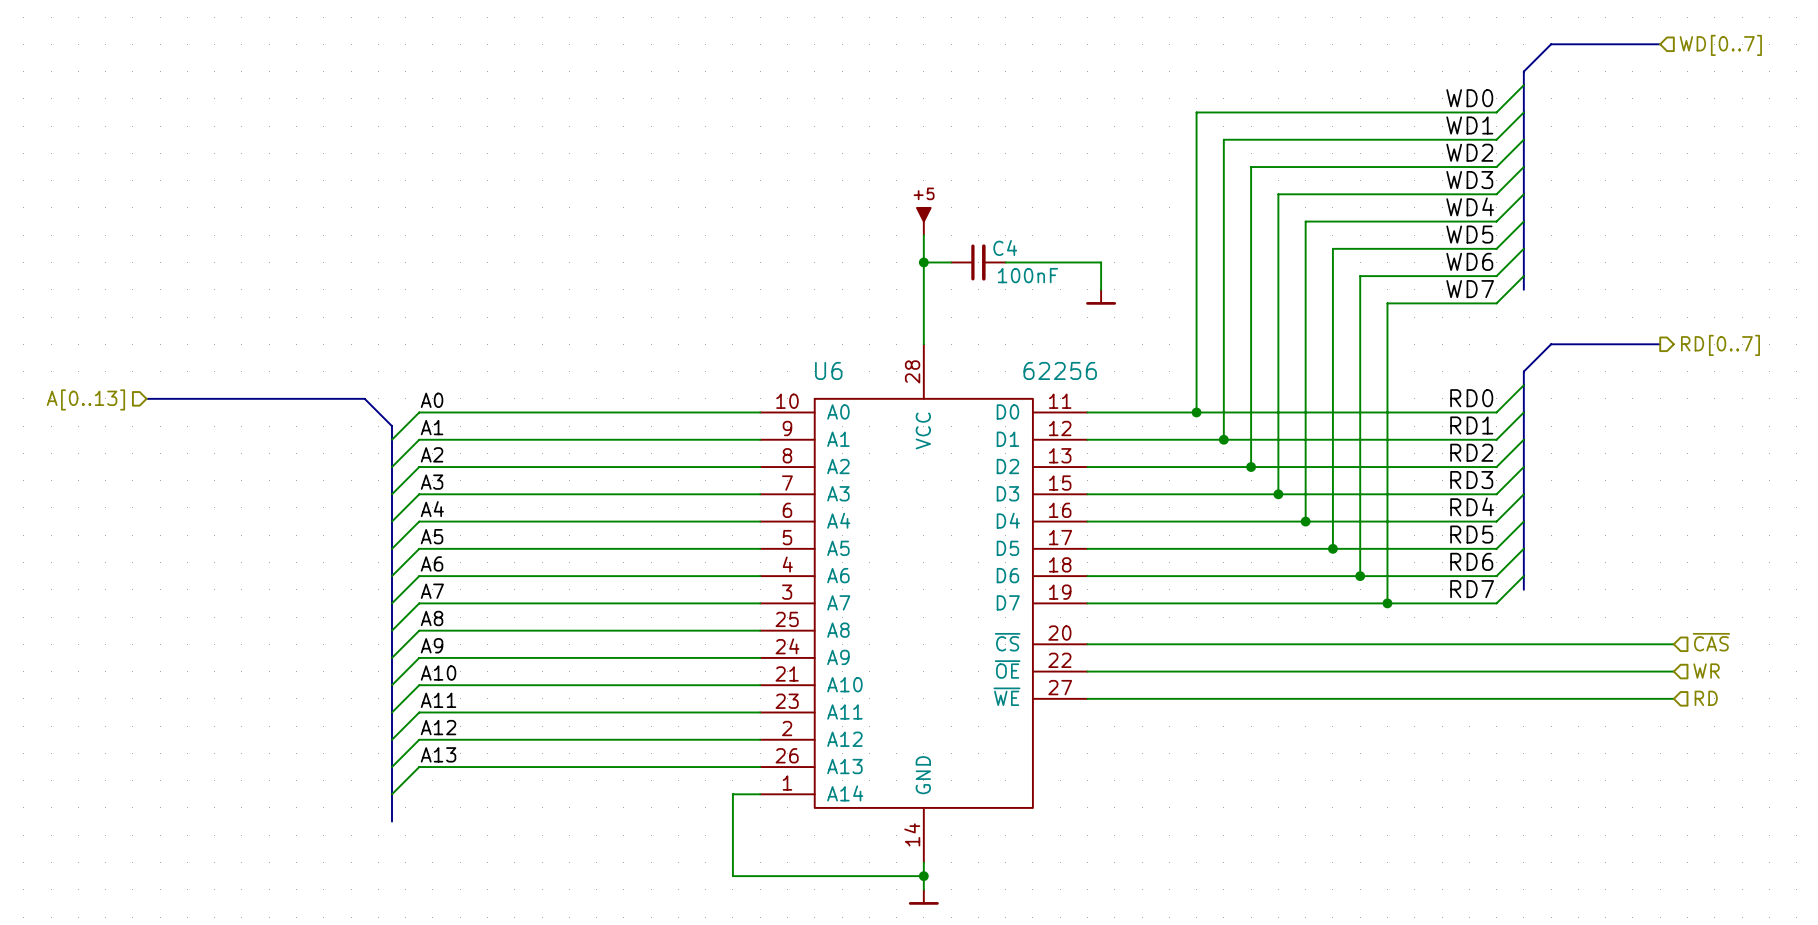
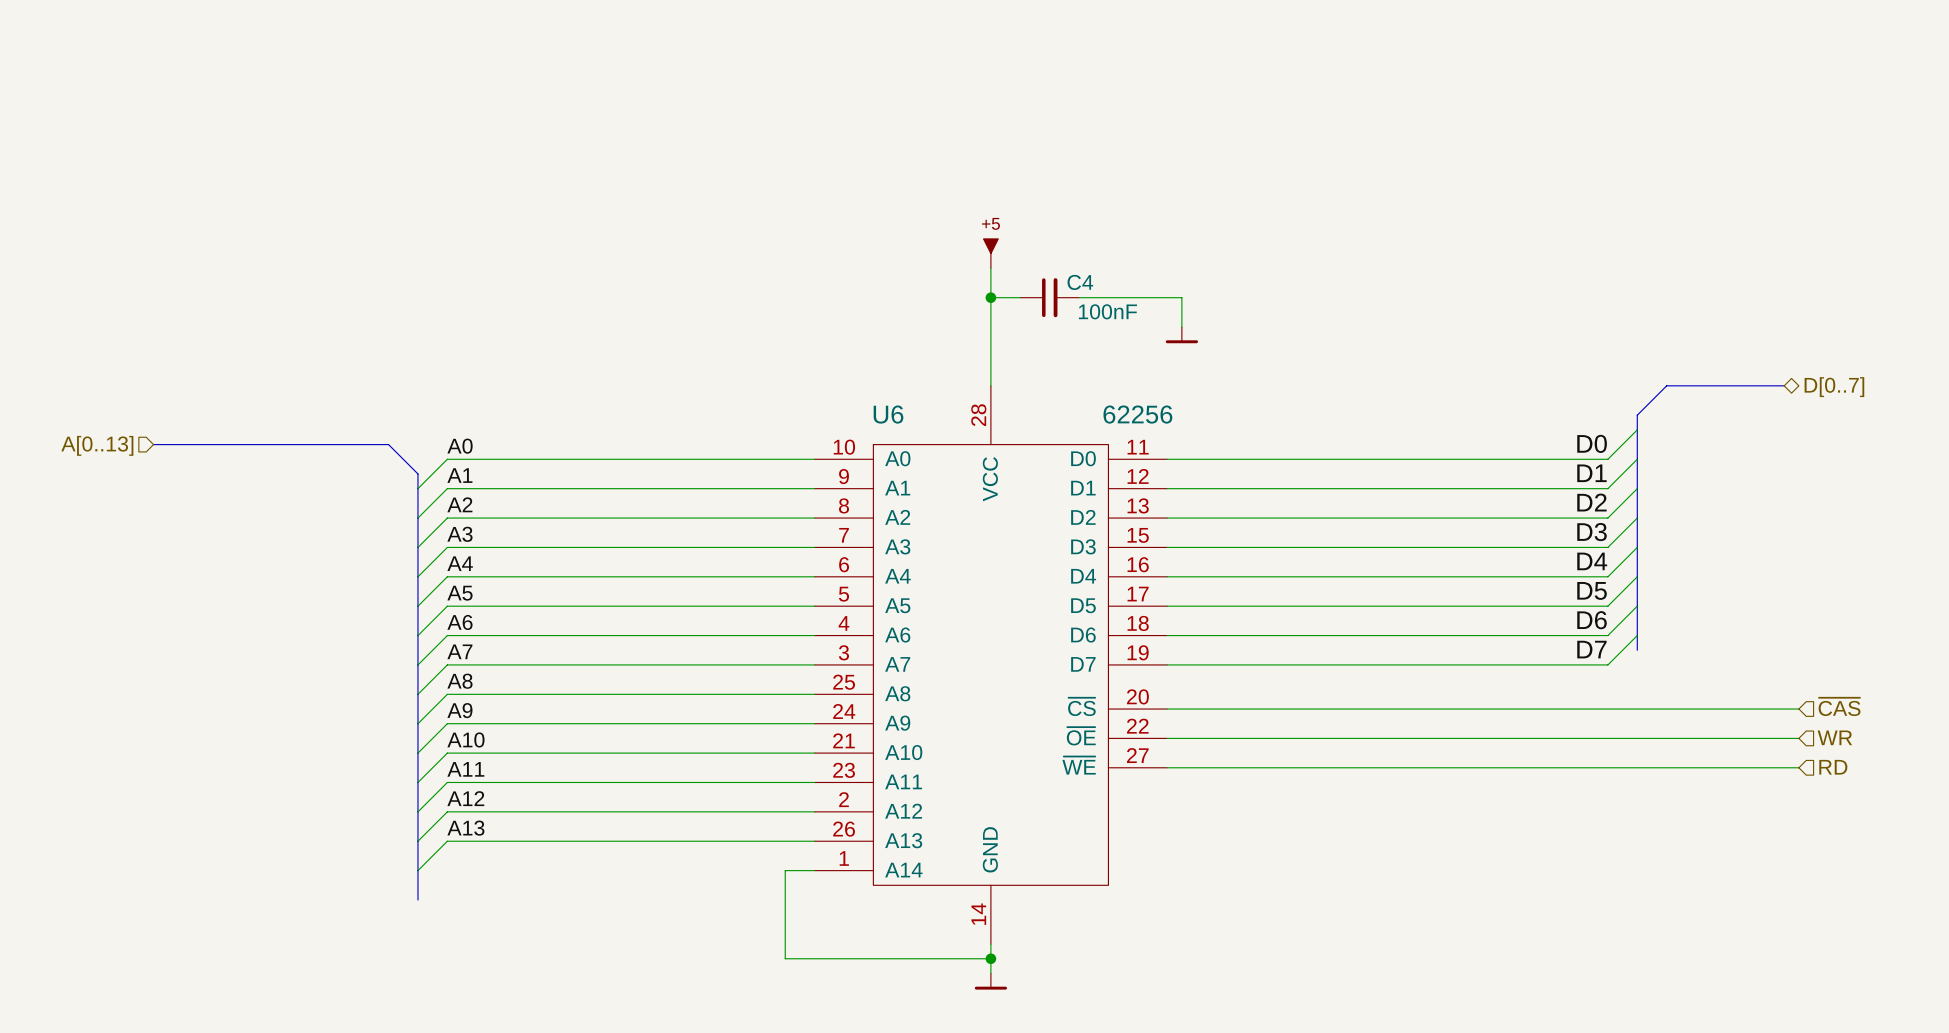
bus: (1660, 44) (1551, 44) (1523, 71) (1523, 289) -> none
hierarchical label: WD[0..7] (1720, 45) -> none
wire: (1523, 85) (1496, 112) (1196, 112) (1196, 412) -> none
label: WD0 (1469, 98) -> none
wire: (1523, 112) (1496, 139) (1223, 139) (1223, 439) -> none
label: WD1 (1469, 125) -> none
wire: (1523, 139) (1496, 167) (1251, 167) (1251, 467) -> none
label: WD2 (1469, 152) -> none
wire: (1523, 167) (1496, 194) (1278, 194) (1278, 494) -> none
label: WD3 (1469, 180) -> none
wire: (1523, 194) (1496, 221) (1305, 221) (1305, 521) -> none
label: WD4 (1470, 206) -> none
wire: (1523, 221) (1496, 248) (1332, 248) (1332, 548) -> none
label: WD5 (1469, 234) -> none
wire: (1523, 248) (1496, 276) (1360, 276) (1360, 576) -> none
label: WD6 (1469, 261) -> none
wire: (1523, 276) (1496, 303) (1387, 303) (1387, 603) -> none
label: WD7 (1470, 289) -> none
hierarchical label shape: output (1720, 345) -> bidirectional (1834, 387)
hierarchical label: RD[0..7] (1720, 345) -> D[0..7] (1834, 387)
label: RD0 (1471, 398) -> D0 (1592, 443)
junction: (1196, 412) -> none
label: RD1 (1471, 425) -> D1 (1591, 473)
junction: (1223, 439) -> none
label: RD2 (1471, 452) -> D2 (1591, 502)
junction: (1251, 467) -> none
label: RD3 (1471, 480) -> D3 (1592, 532)
junction: (1278, 494) -> none
label: RD4 (1472, 506) -> D4 (1592, 561)
junction: (1305, 521) -> none
label: RD5 (1471, 534) -> D5 (1592, 590)
junction: (1332, 548) -> none
label: RD6 (1471, 561) -> D6 (1592, 620)
junction: (1360, 576) -> none
label: RD7 (1472, 589) -> D7 (1591, 649)
junction: (1387, 603) -> none

